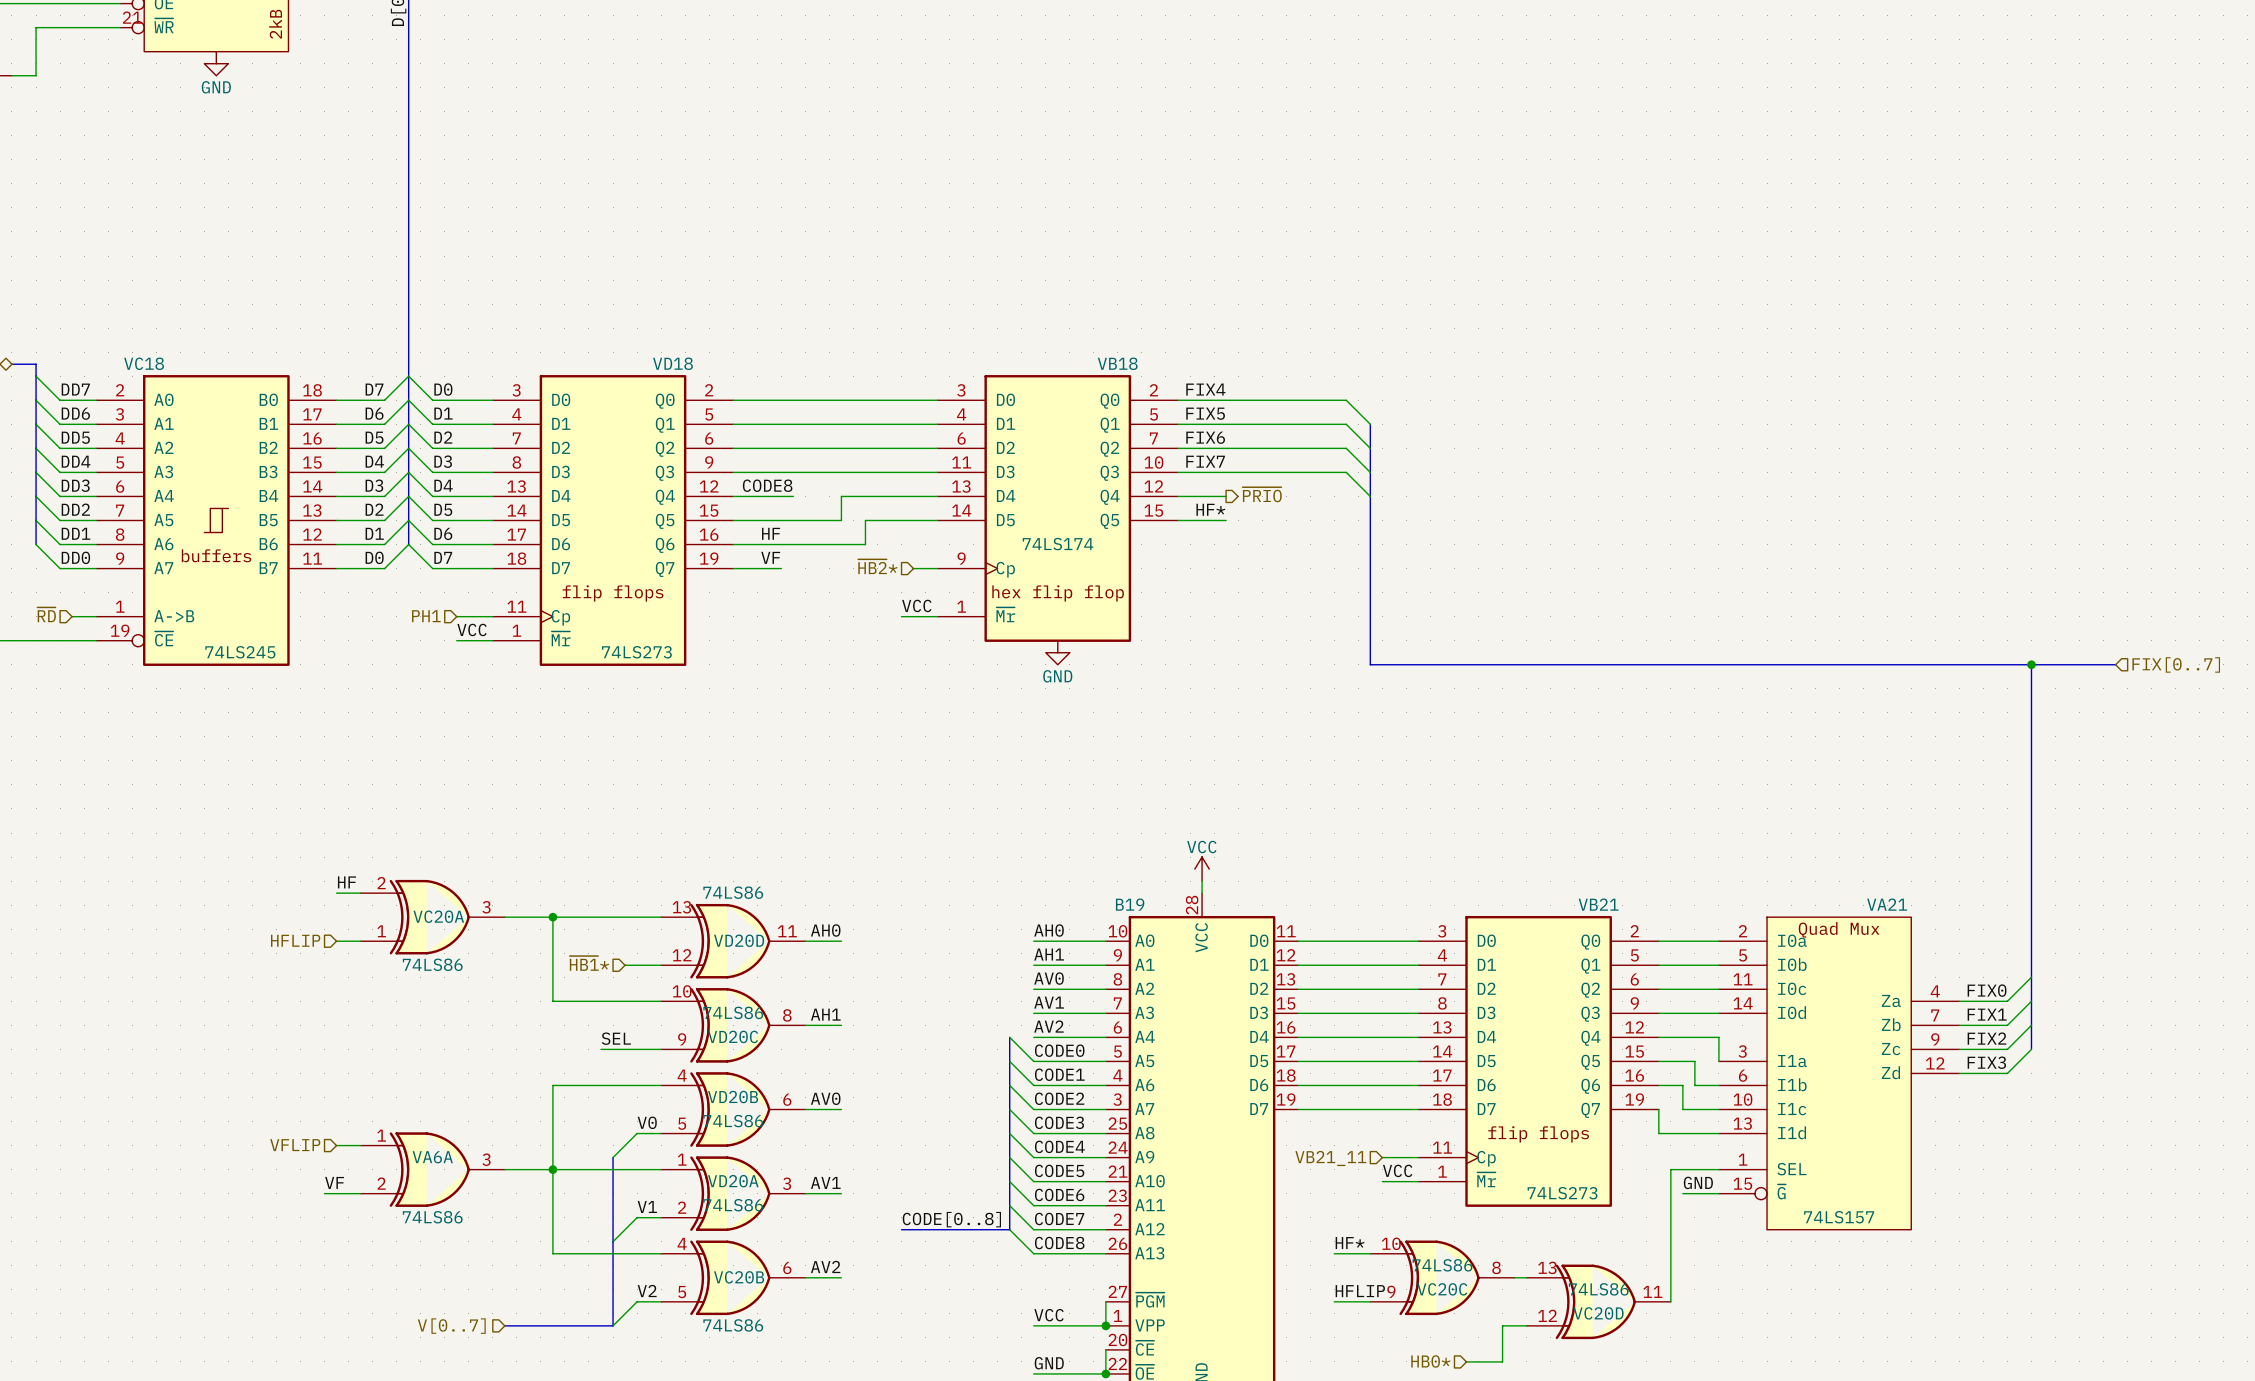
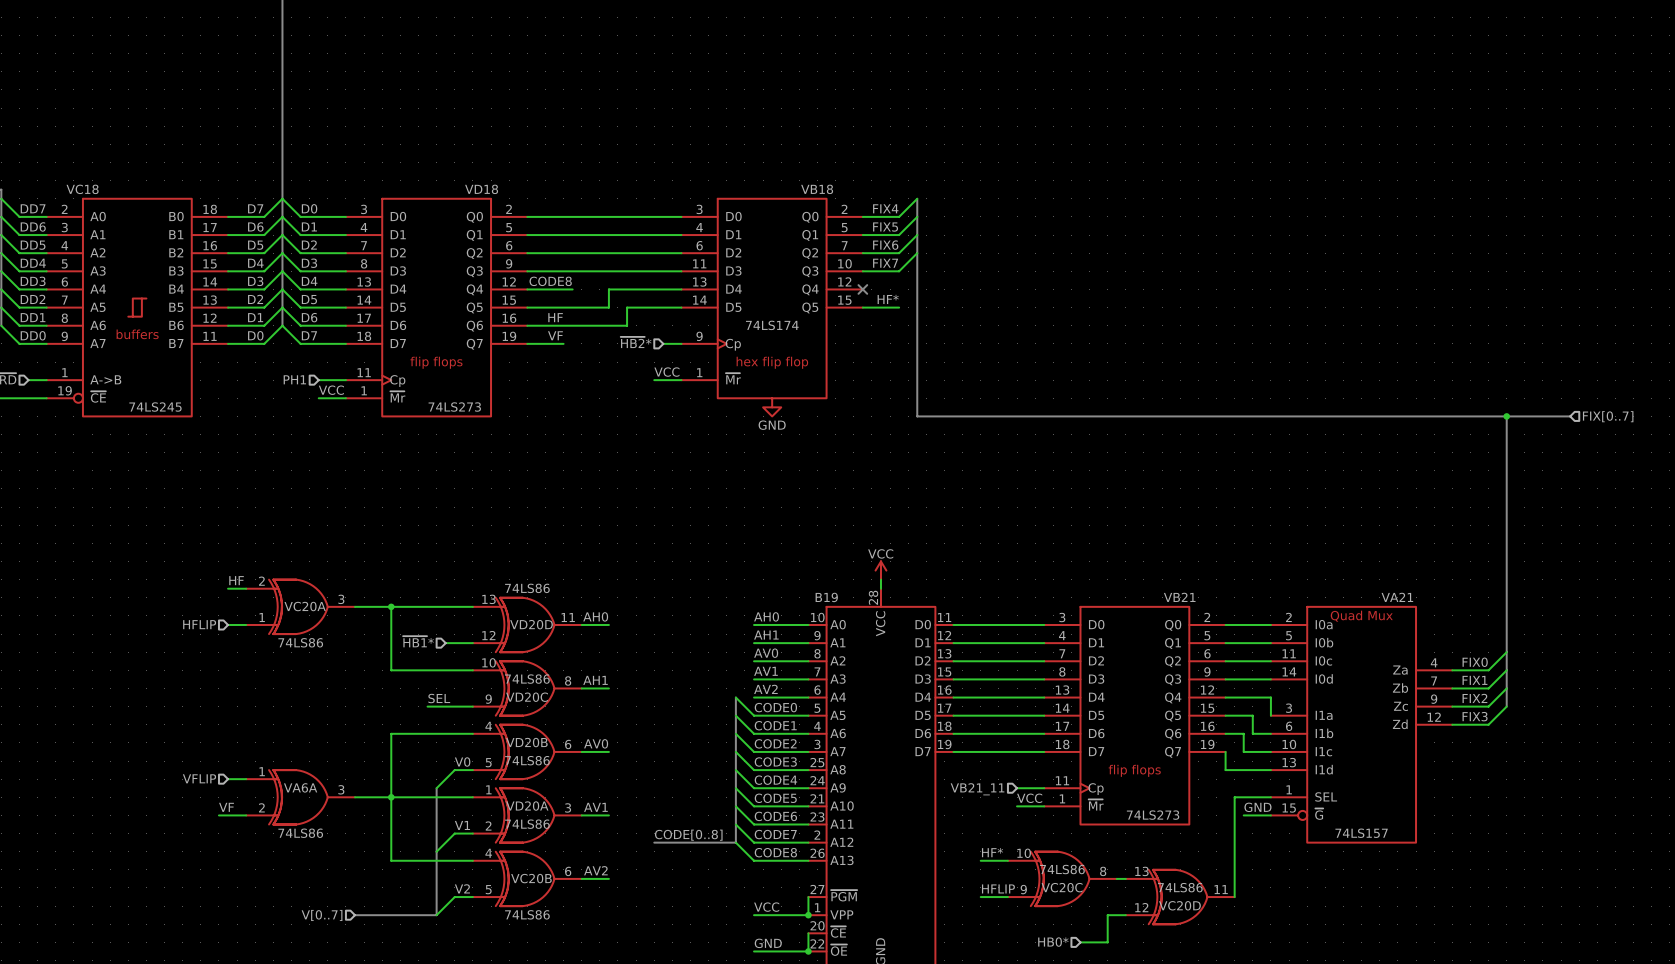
wire: (1226, 400) (1346, 400) (1370, 424) -> (899, 216) (917, 198)
wire: (1226, 424) (1346, 424) (1370, 448) -> (899, 235) (917, 216)
bus: (1370, 424) (1370, 664) -> (917, 198) (917, 416) (1007, 416)
wire: (1226, 448) (1346, 448) (1370, 472) -> (899, 253) (917, 235)
wire: (1226, 472) (1346, 472) (1370, 496) -> (899, 271) (917, 253)
hierarchical label: ~{PRIO} (1262, 494) -> none
wire: (1178, 496) (1226, 496) -> none
no-connect mark: none -> (862, 289)

